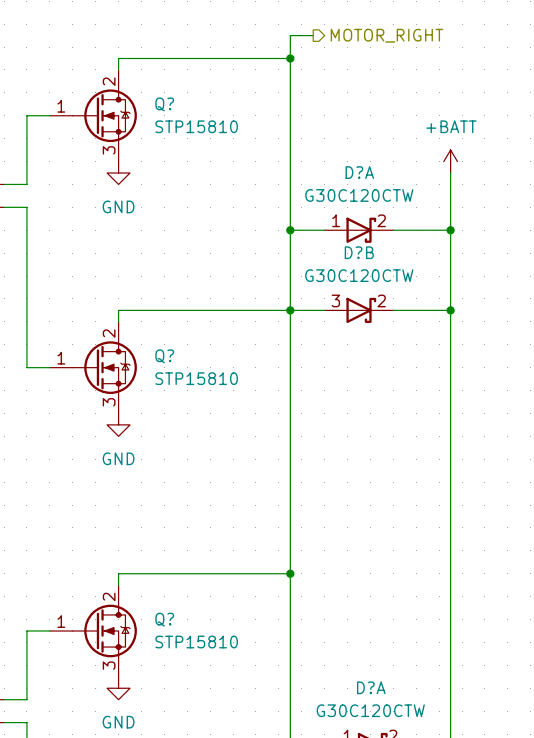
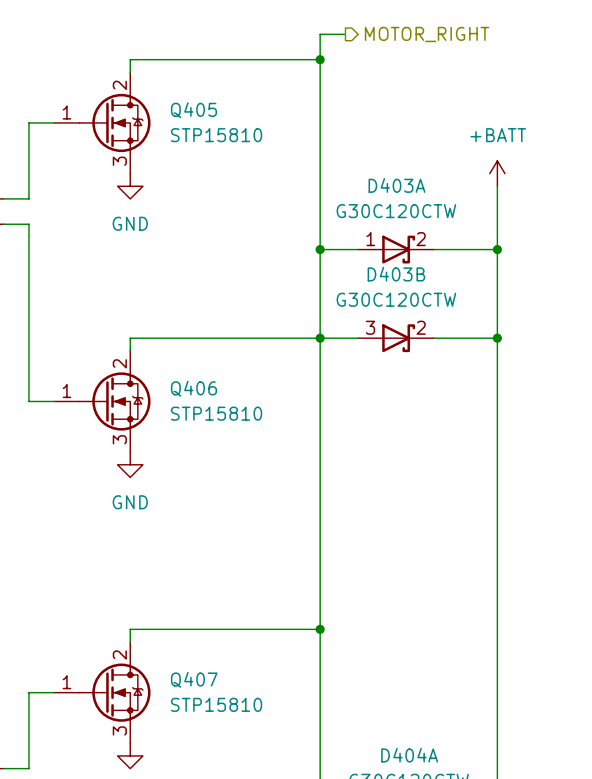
Q? name: Q? (164, 104) -> Q405 (193, 110)
D?A name: D?A (359, 172) -> D403A (397, 185)
D?B name: D?B (359, 252) -> D403B (396, 274)
Q? name: Q? (164, 356) -> Q406 (193, 388)
Q? name: Q? (164, 619) -> Q407 (194, 679)
D?A name: D?A (371, 687) -> D404A (409, 755)

